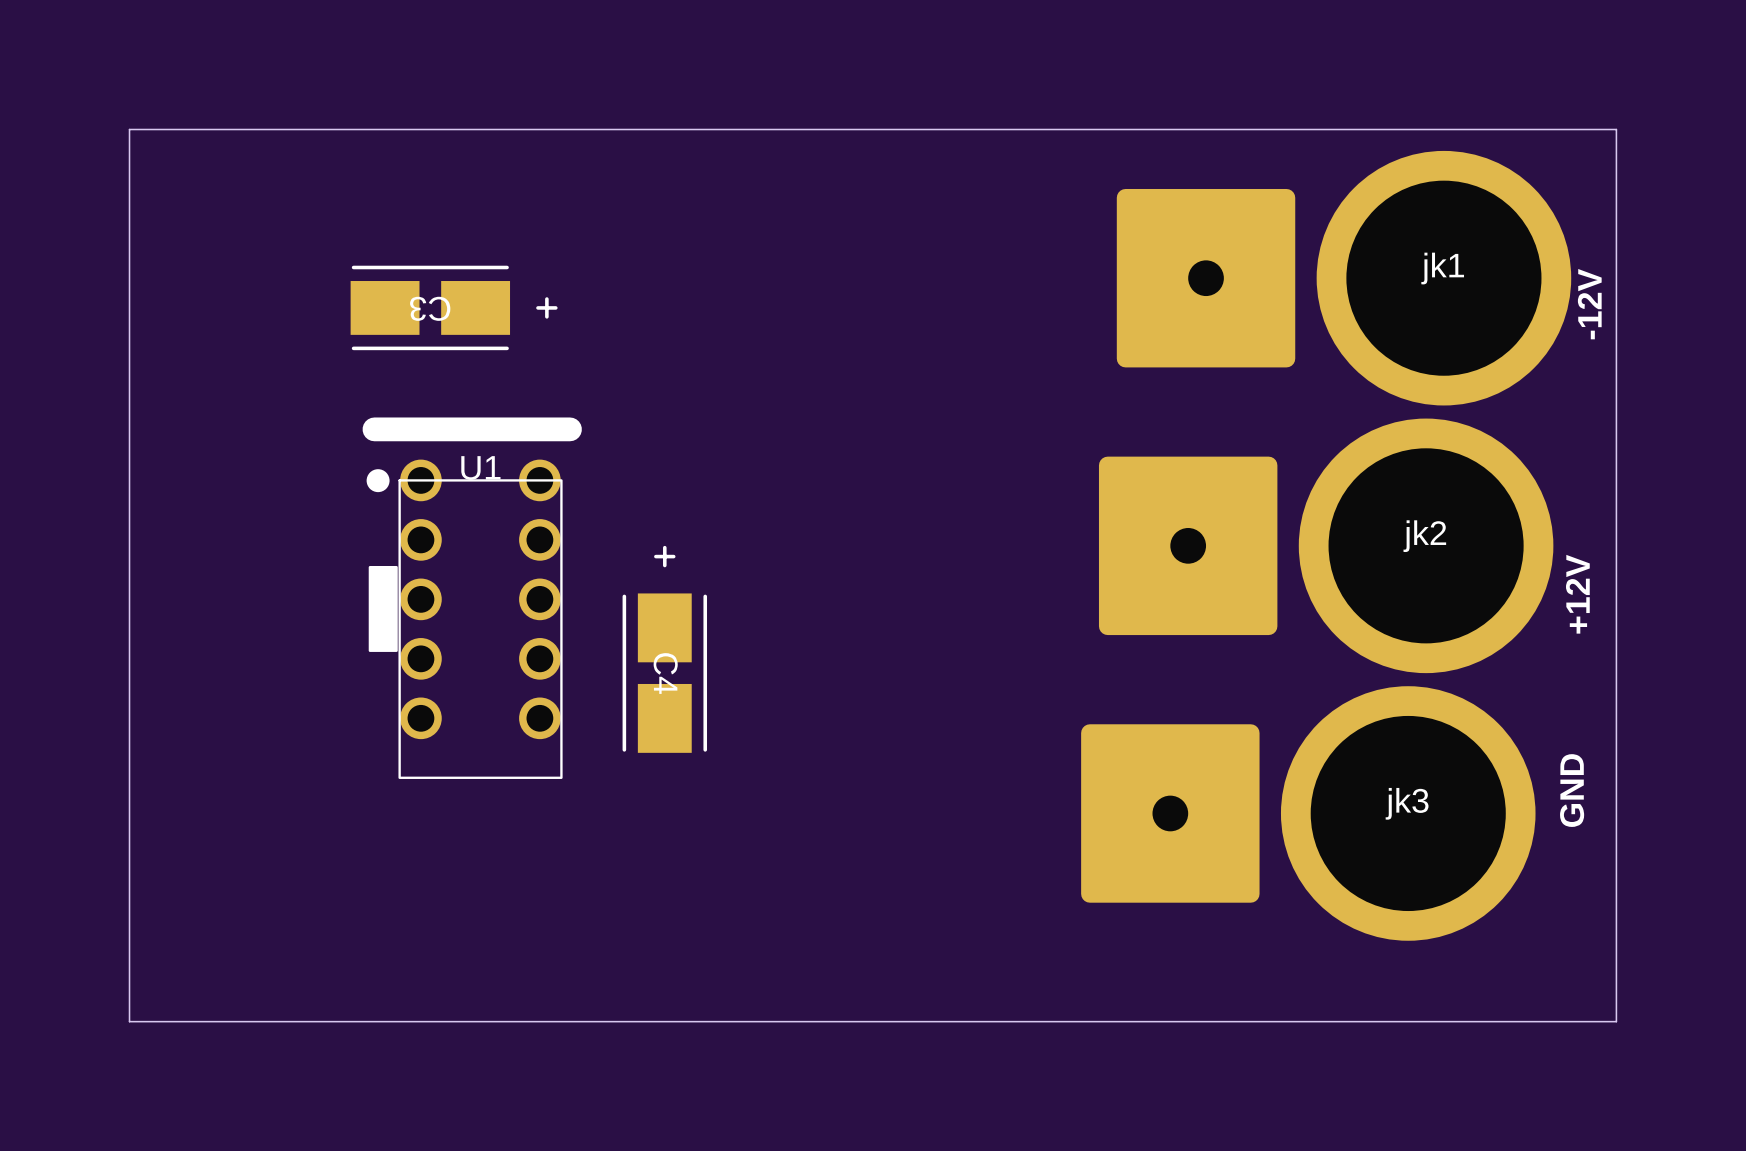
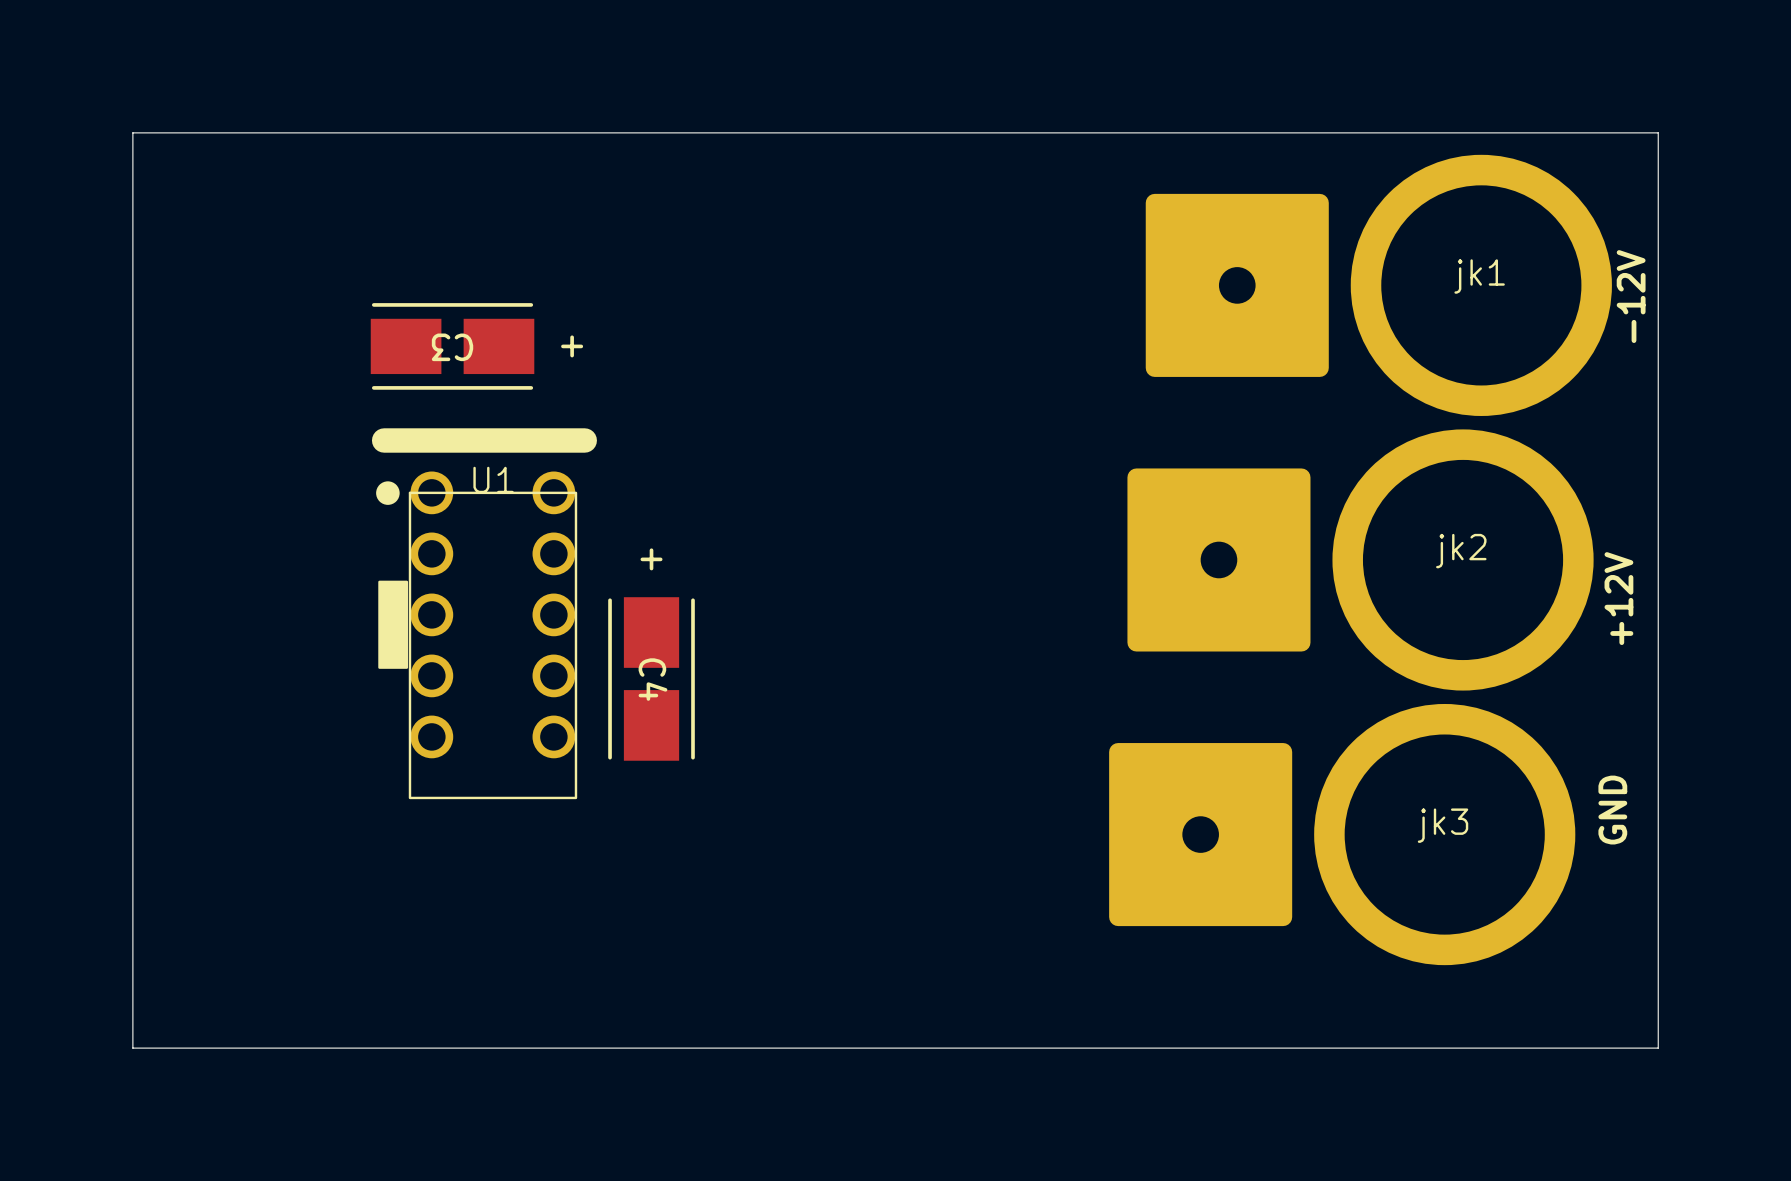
C3 position: (454, 307) -> (476, 346)
C4 position: (664, 649) -> (651, 654)

